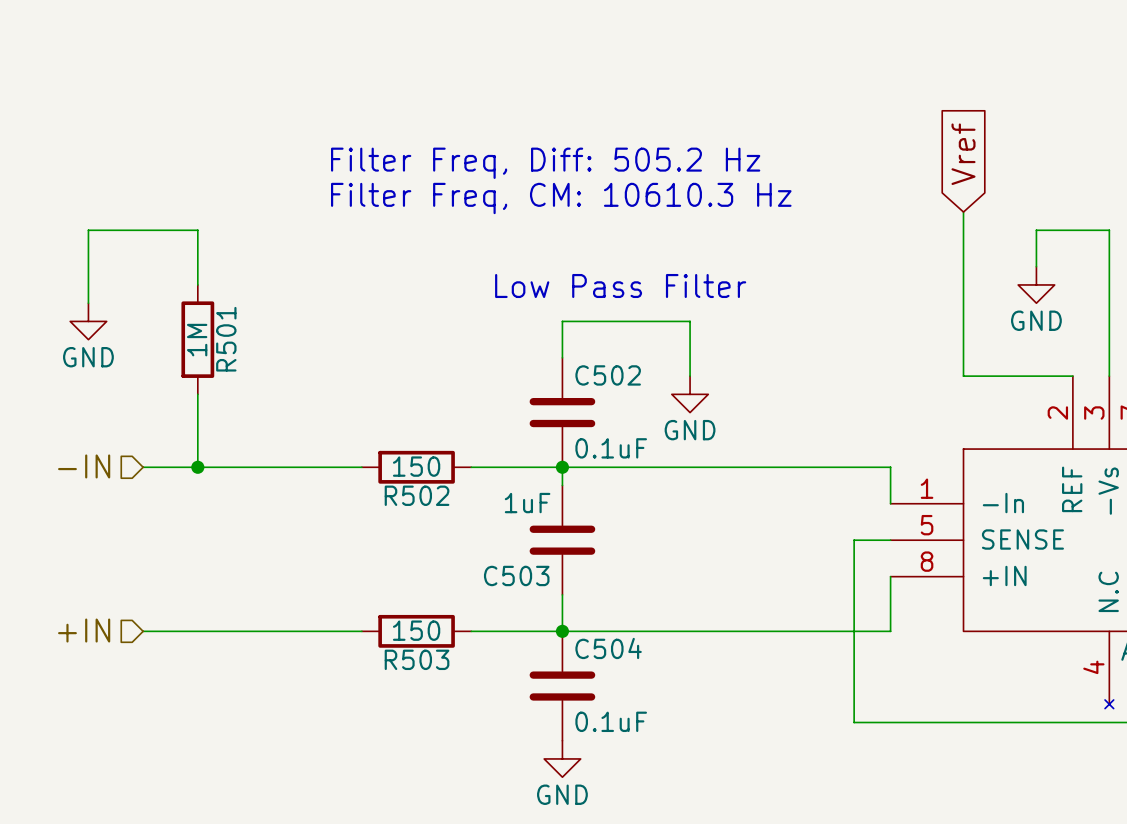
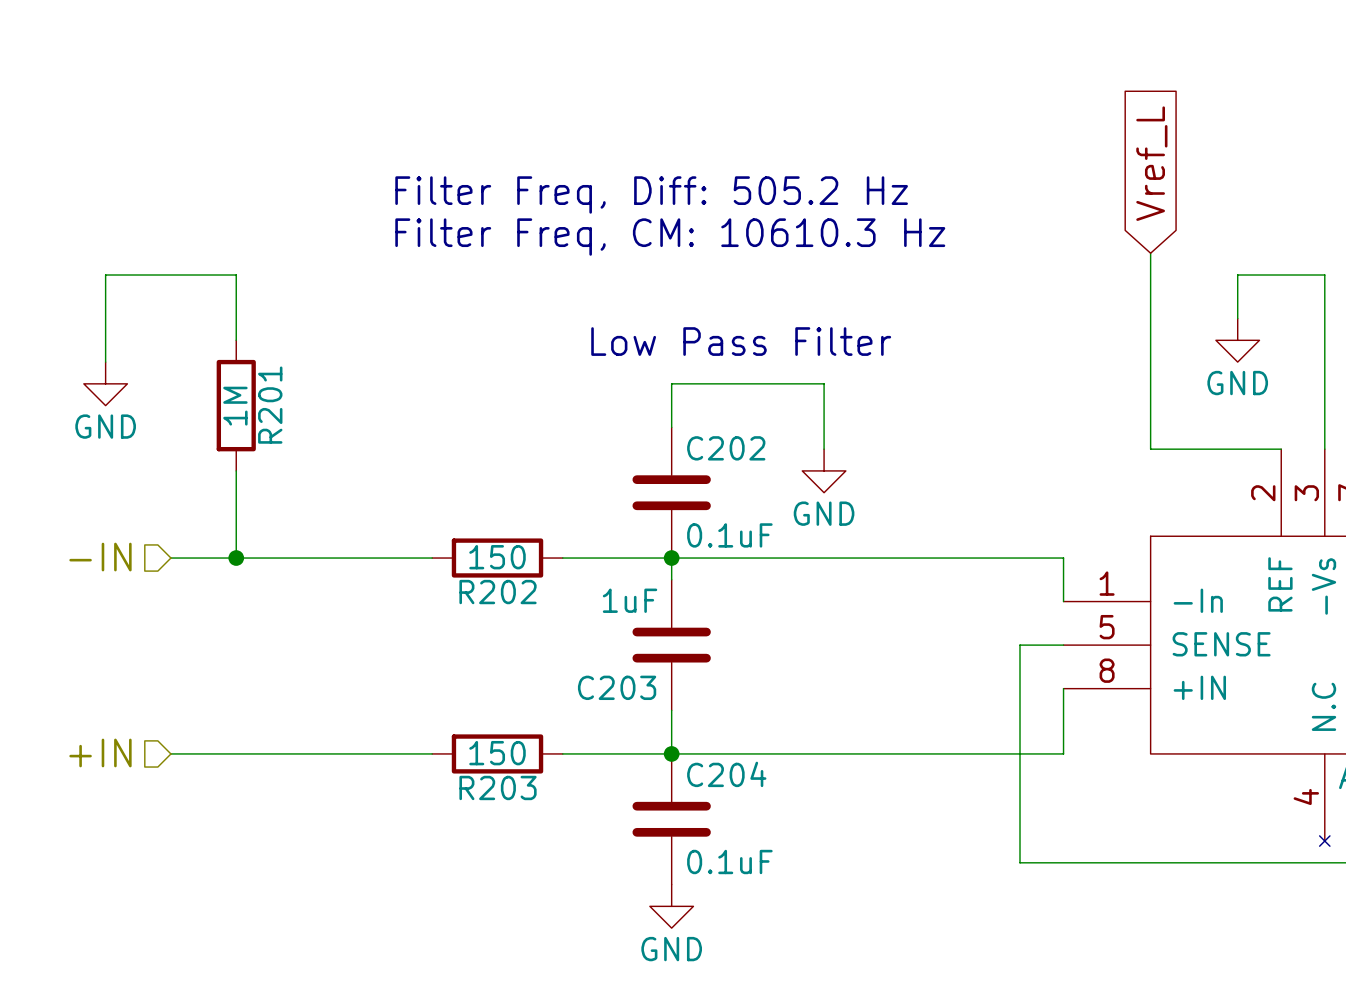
global label: Vref (963, 154) -> Vref_L (1151, 163)
R501 name: R501 (226, 339) -> R201 (270, 405)
C502 name: C502 (608, 375) -> C202 (726, 448)
R502 name: R502 (417, 495) -> R202 (498, 592)
C503 name: C503 (516, 575) -> C203 (617, 687)
C504 name: C504 (608, 648) -> C204 (726, 774)
R503 name: R503 (417, 659) -> R203 (498, 787)

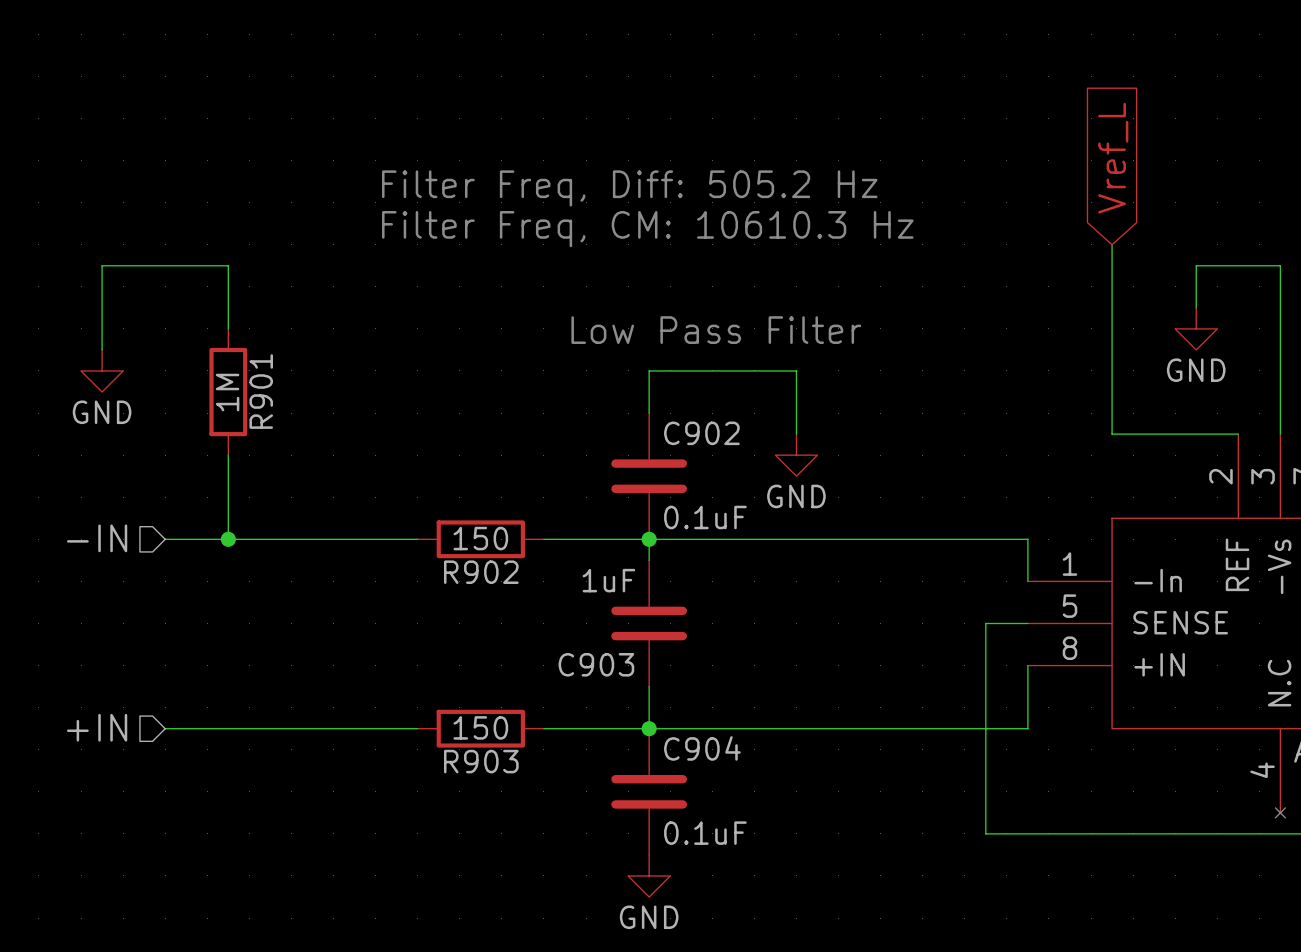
R201 name: R201 (270, 405) -> R901 (261, 391)
C202 name: C202 (726, 448) -> C902 (701, 433)
R202 name: R202 (498, 592) -> R902 (481, 572)
C203 name: C203 (617, 687) -> C903 (596, 664)
C204 name: C204 (726, 774) -> C904 (702, 748)
R203 name: R203 (498, 787) -> R903 (481, 761)

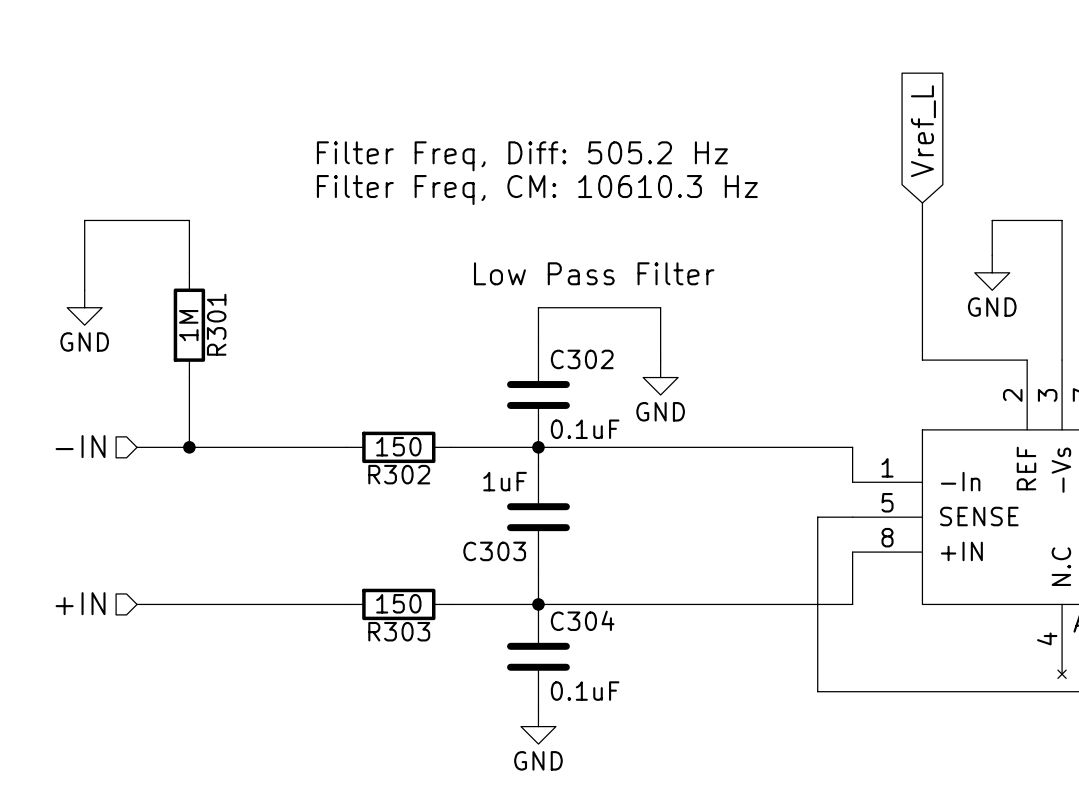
R901 name: R901 (261, 391) -> R301 (216, 324)
C902 name: C902 (701, 433) -> C302 (582, 359)
R902 name: R902 (481, 572) -> R302 (399, 474)
C903 name: C903 (596, 664) -> C303 (494, 551)
C904 name: C904 (702, 748) -> C304 (582, 620)
R903 name: R903 (481, 761) -> R303 (399, 631)

